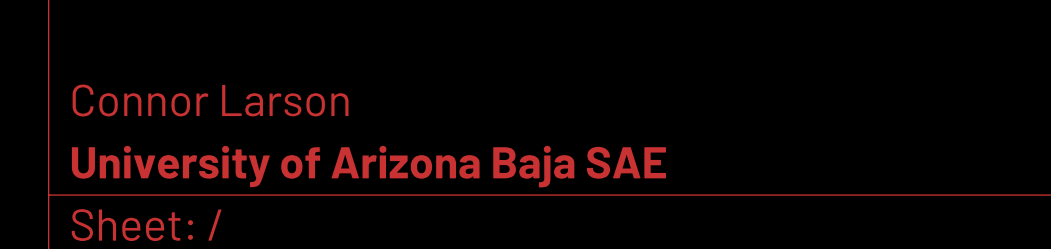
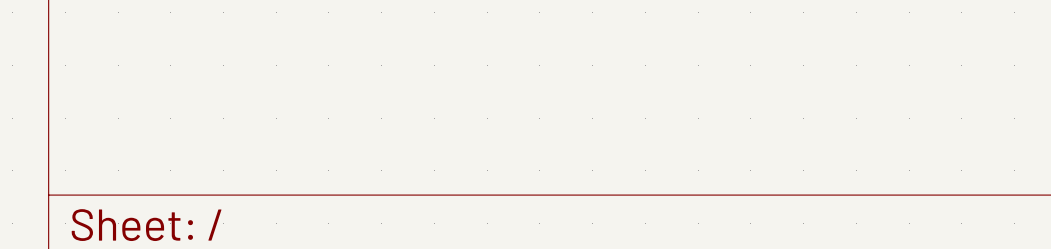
title block: Connor Larson (210, 100) -> none
title block: University of Arizona Baja SAE (368, 166) -> none

